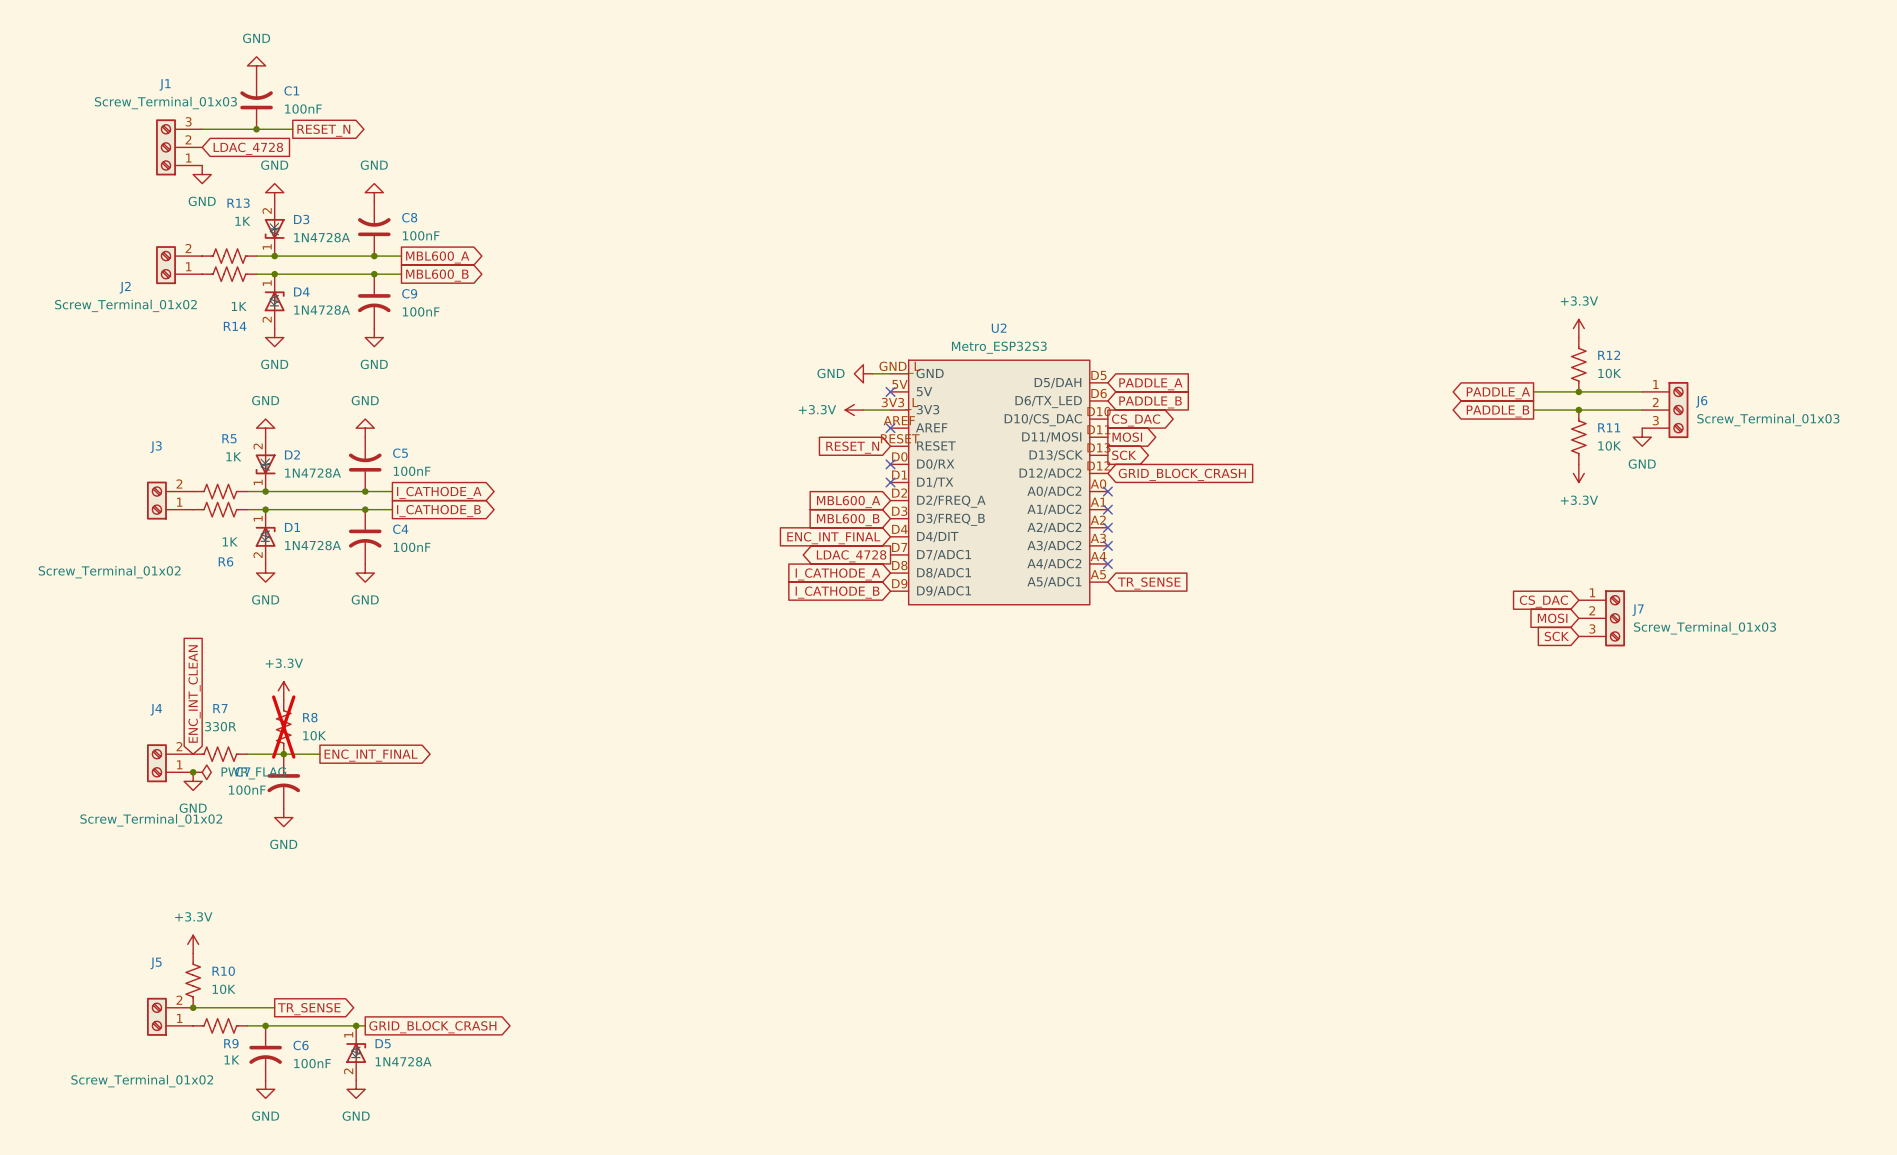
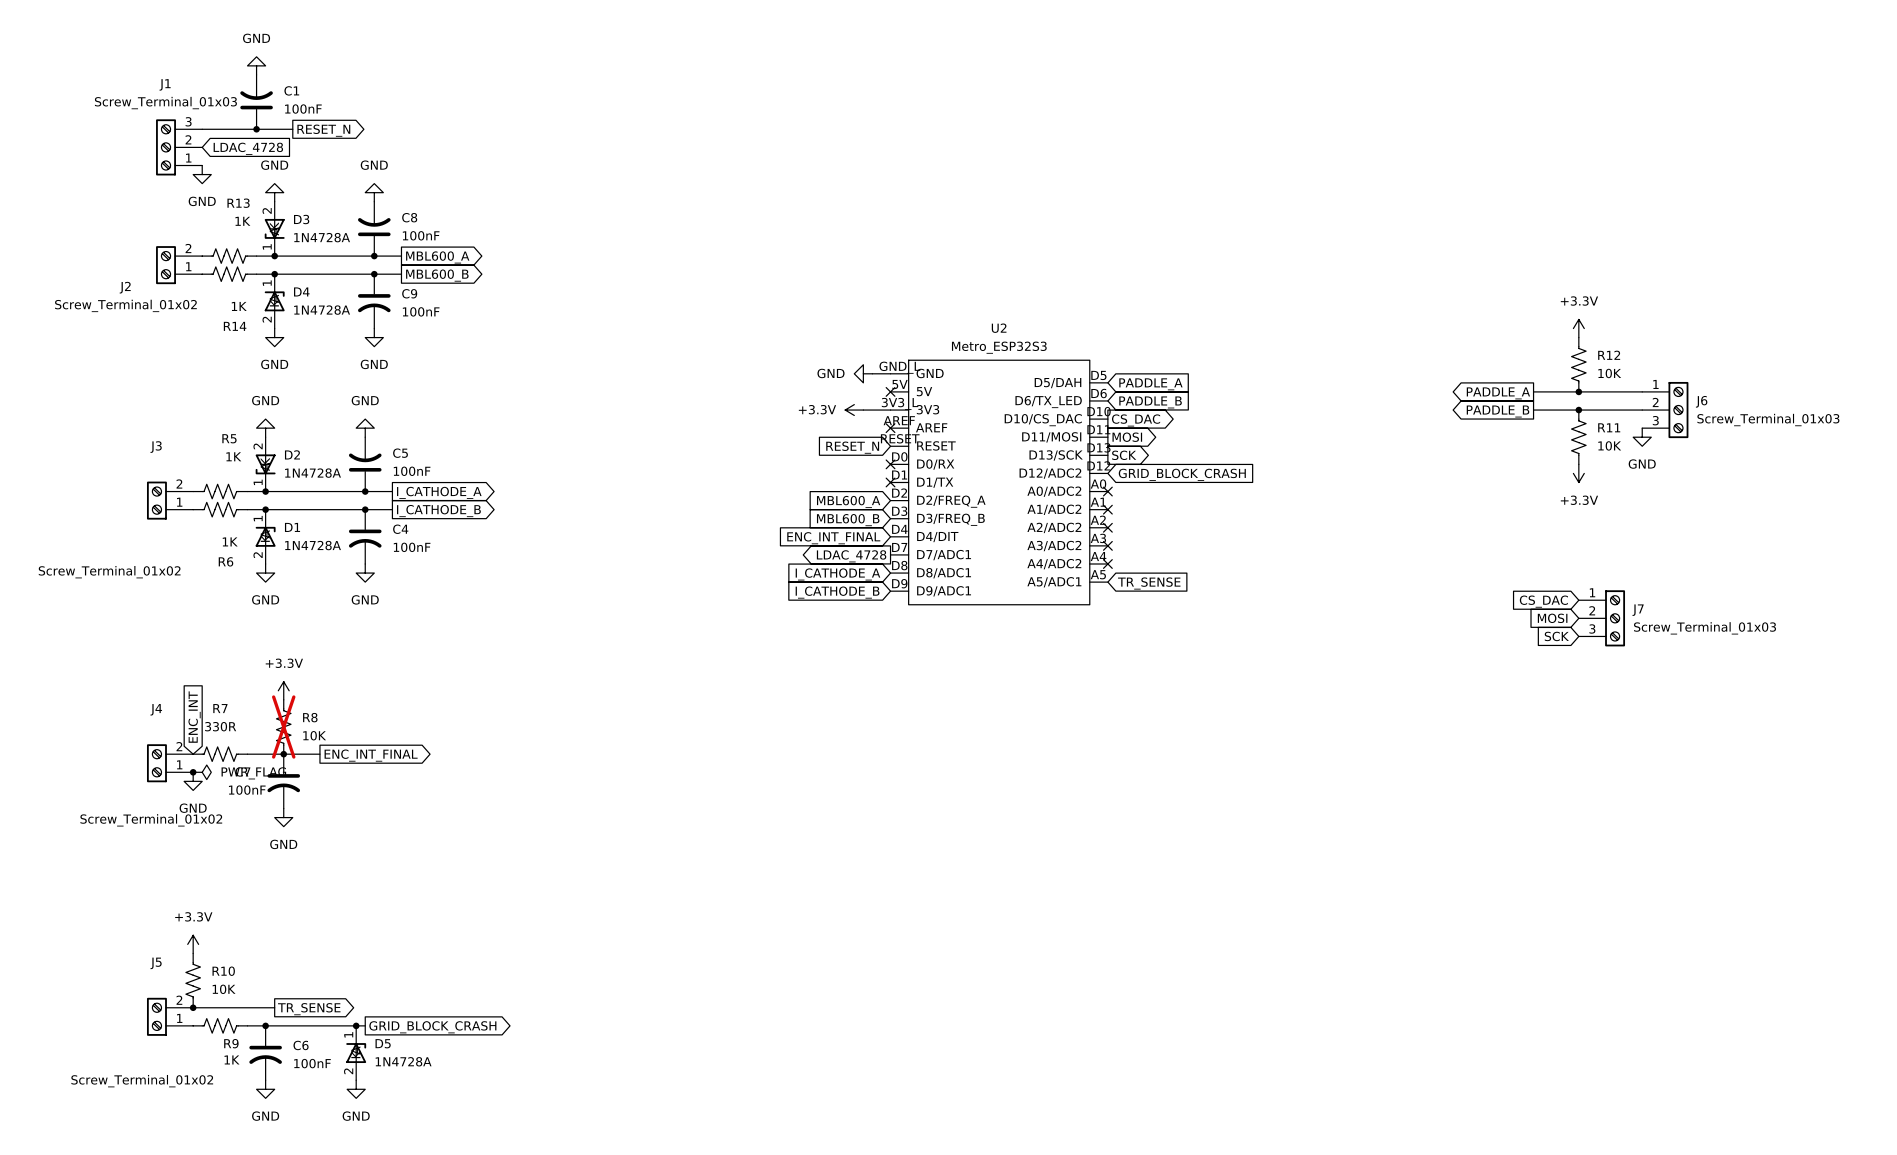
global label: ENC_INT_CLEAN (194, 693) -> ENC_INT (194, 717)

